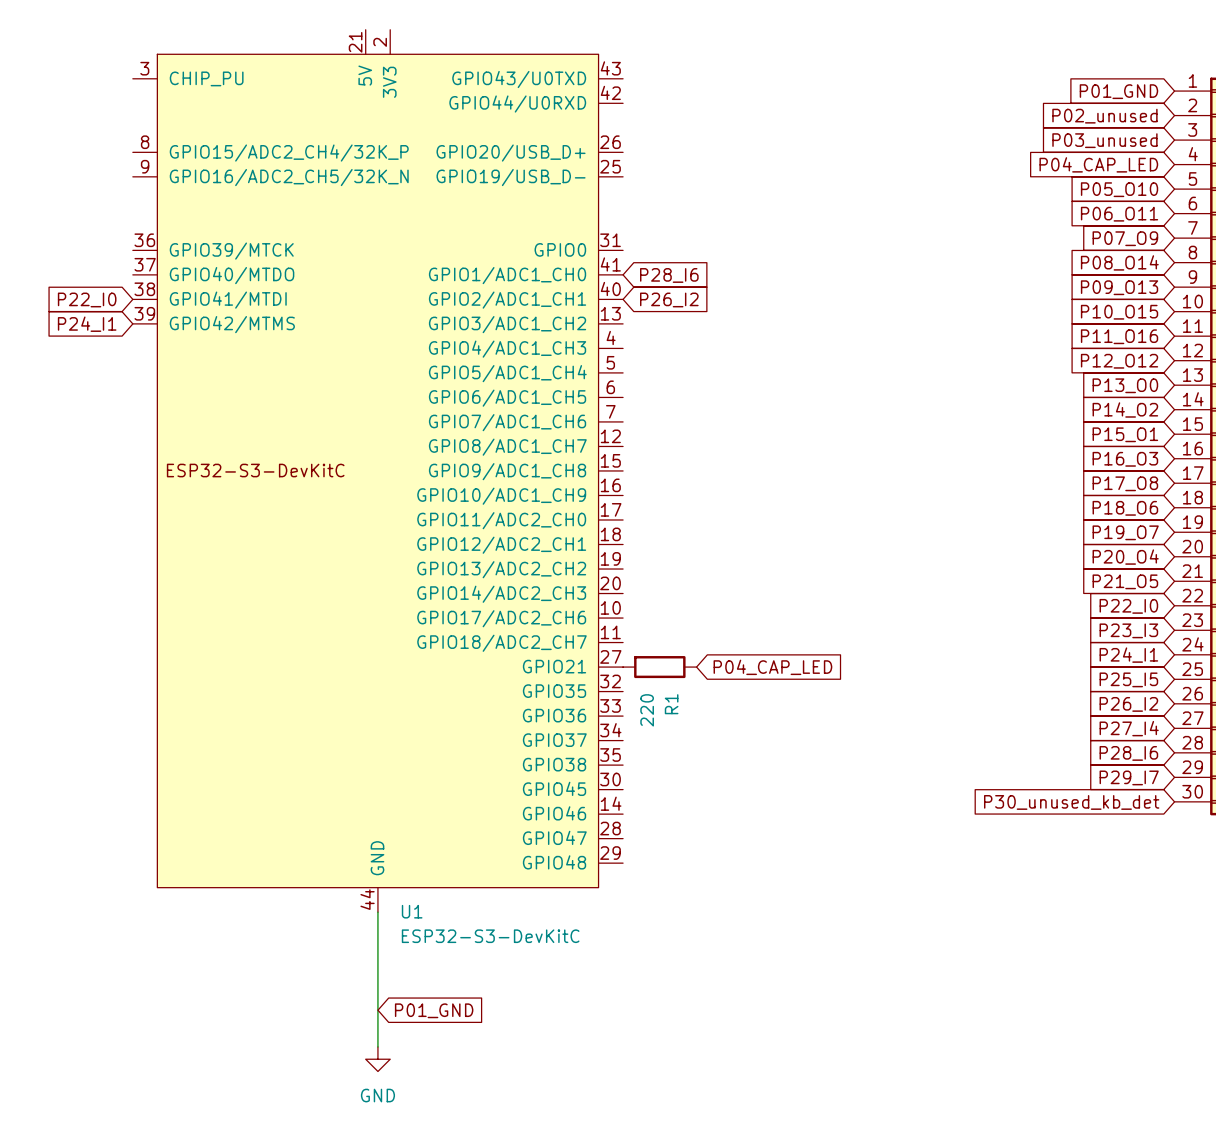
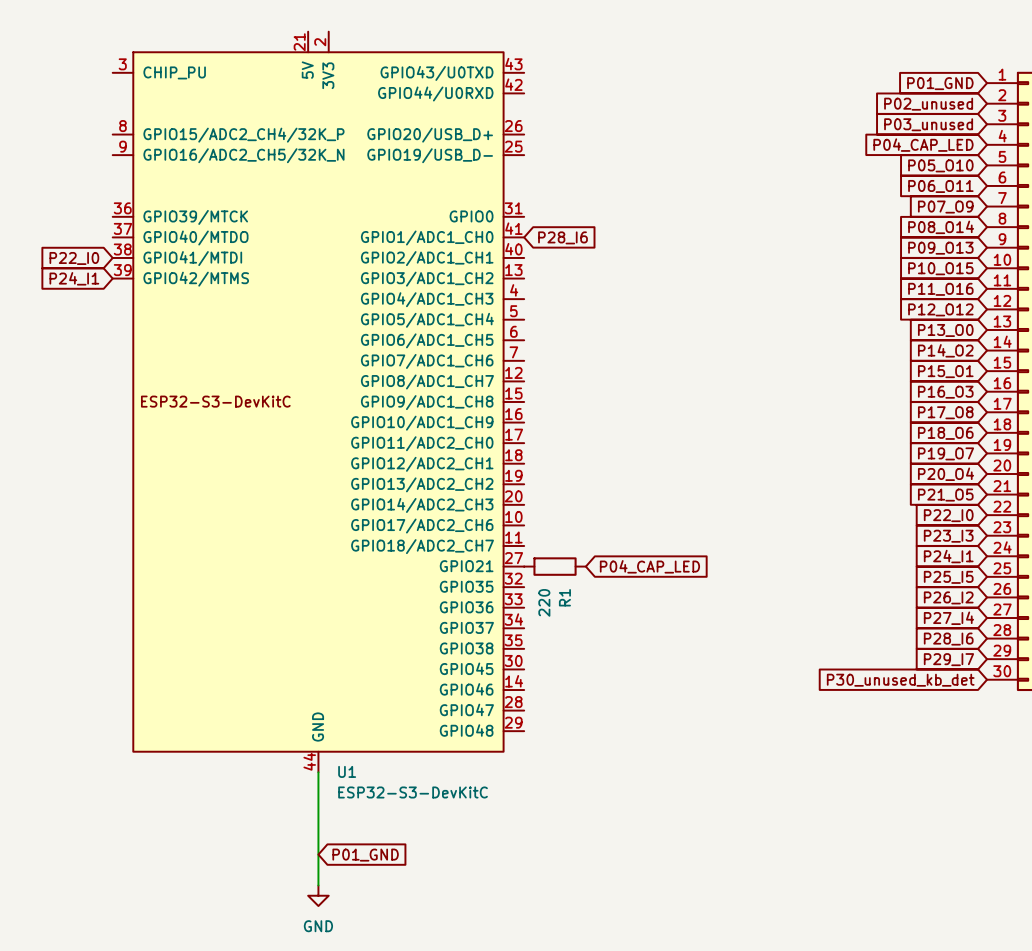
global label: P26_I2 (669, 299) -> none

